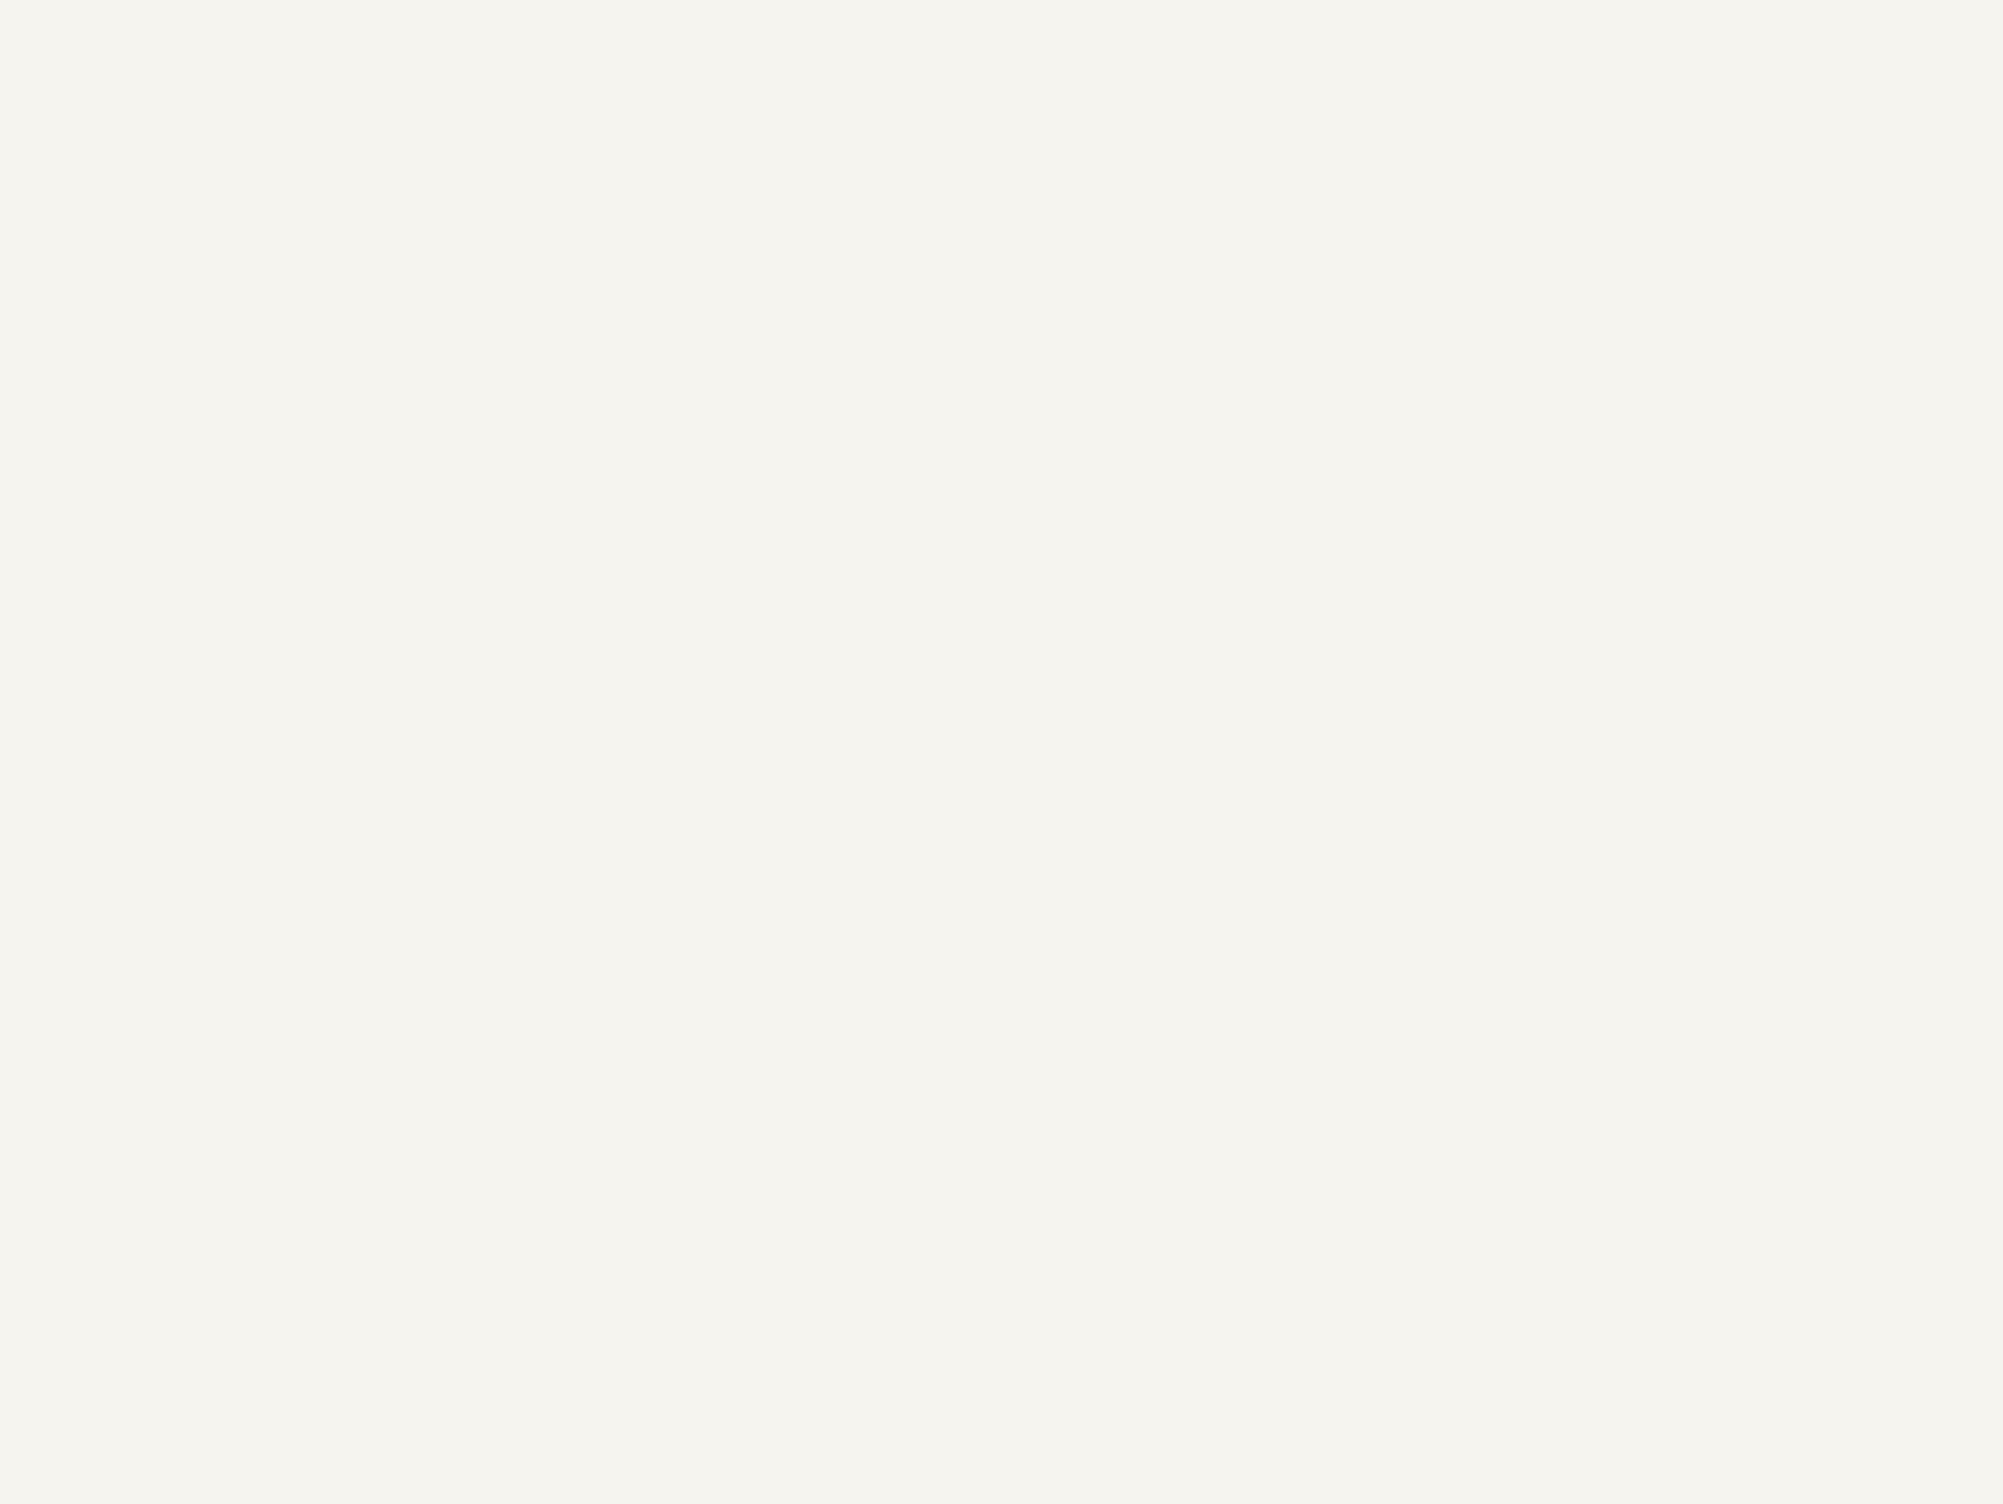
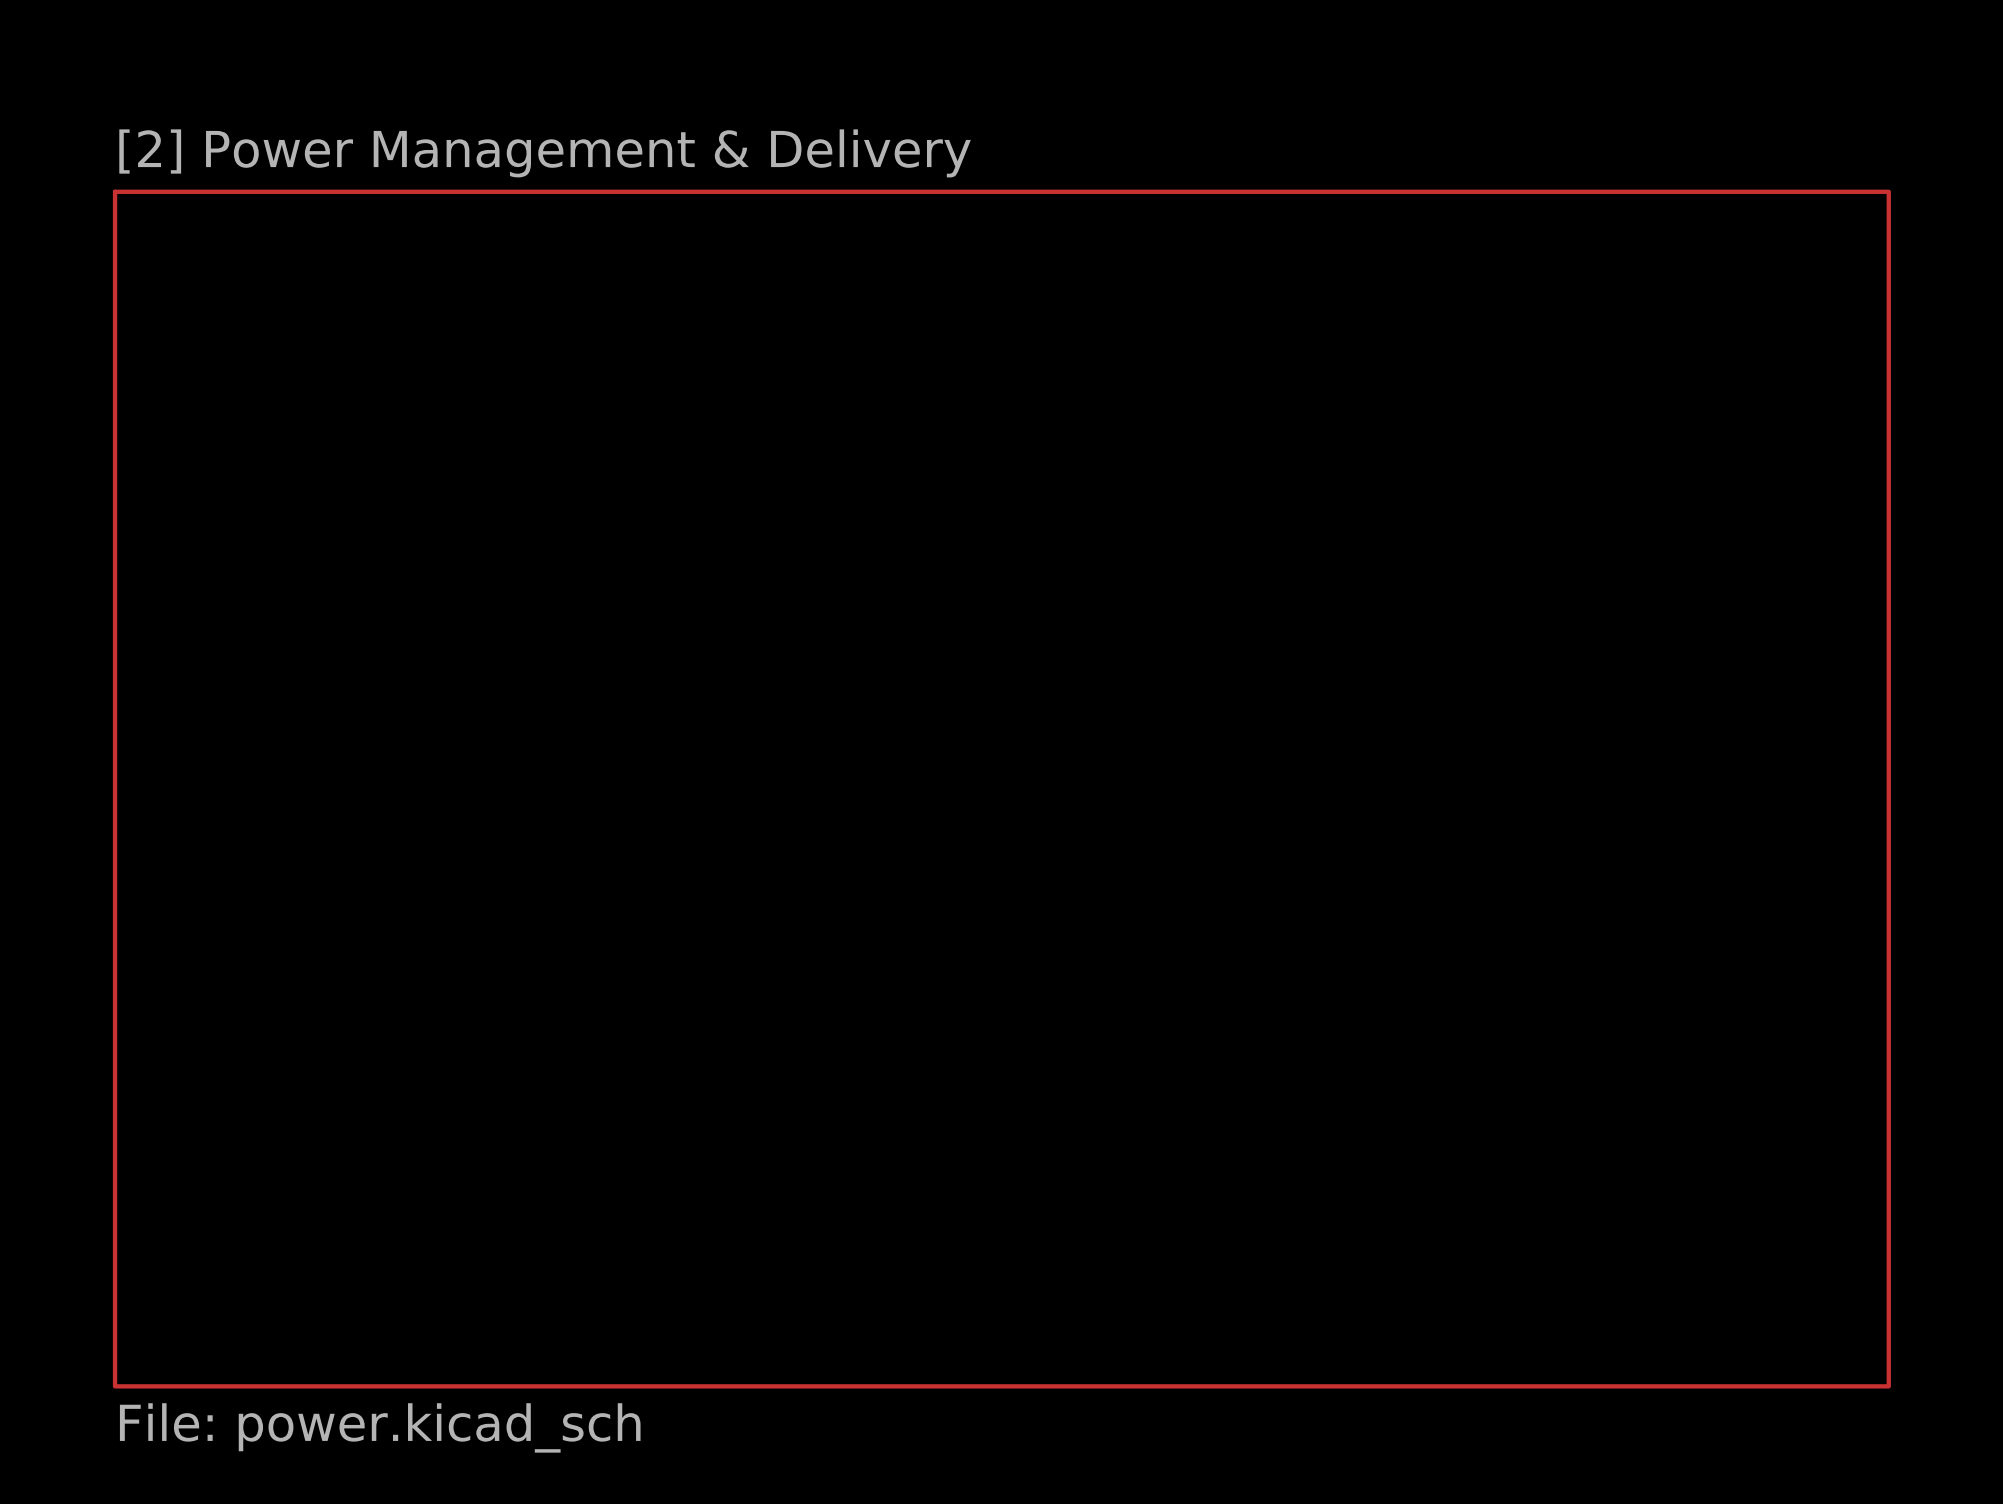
sheet [2] Power Management & Delivery: none -> File: power.kicad_sch (1001, 789)

